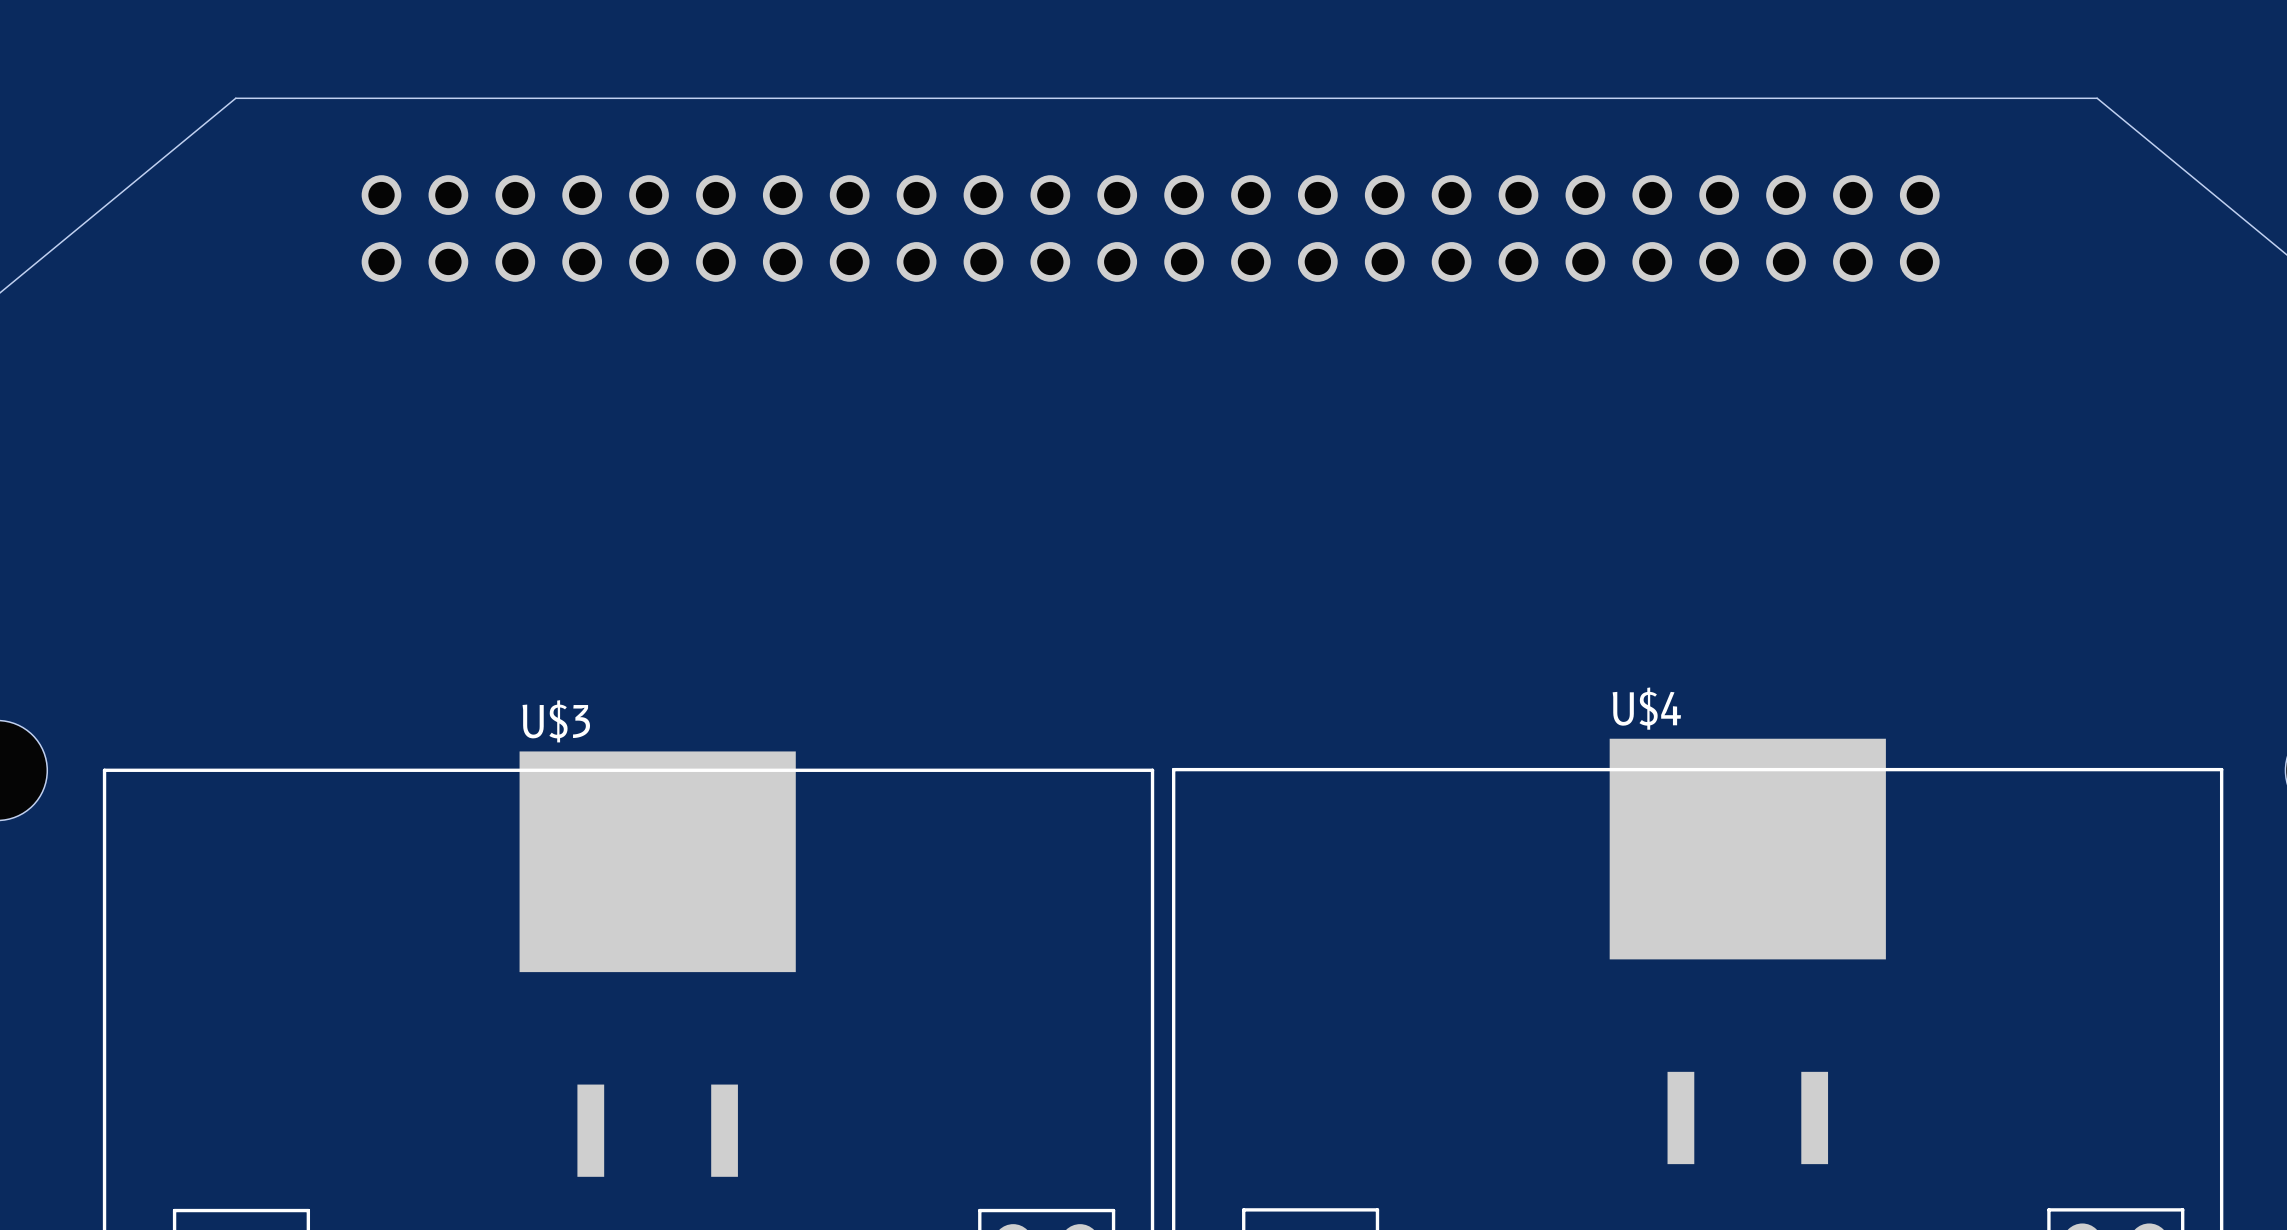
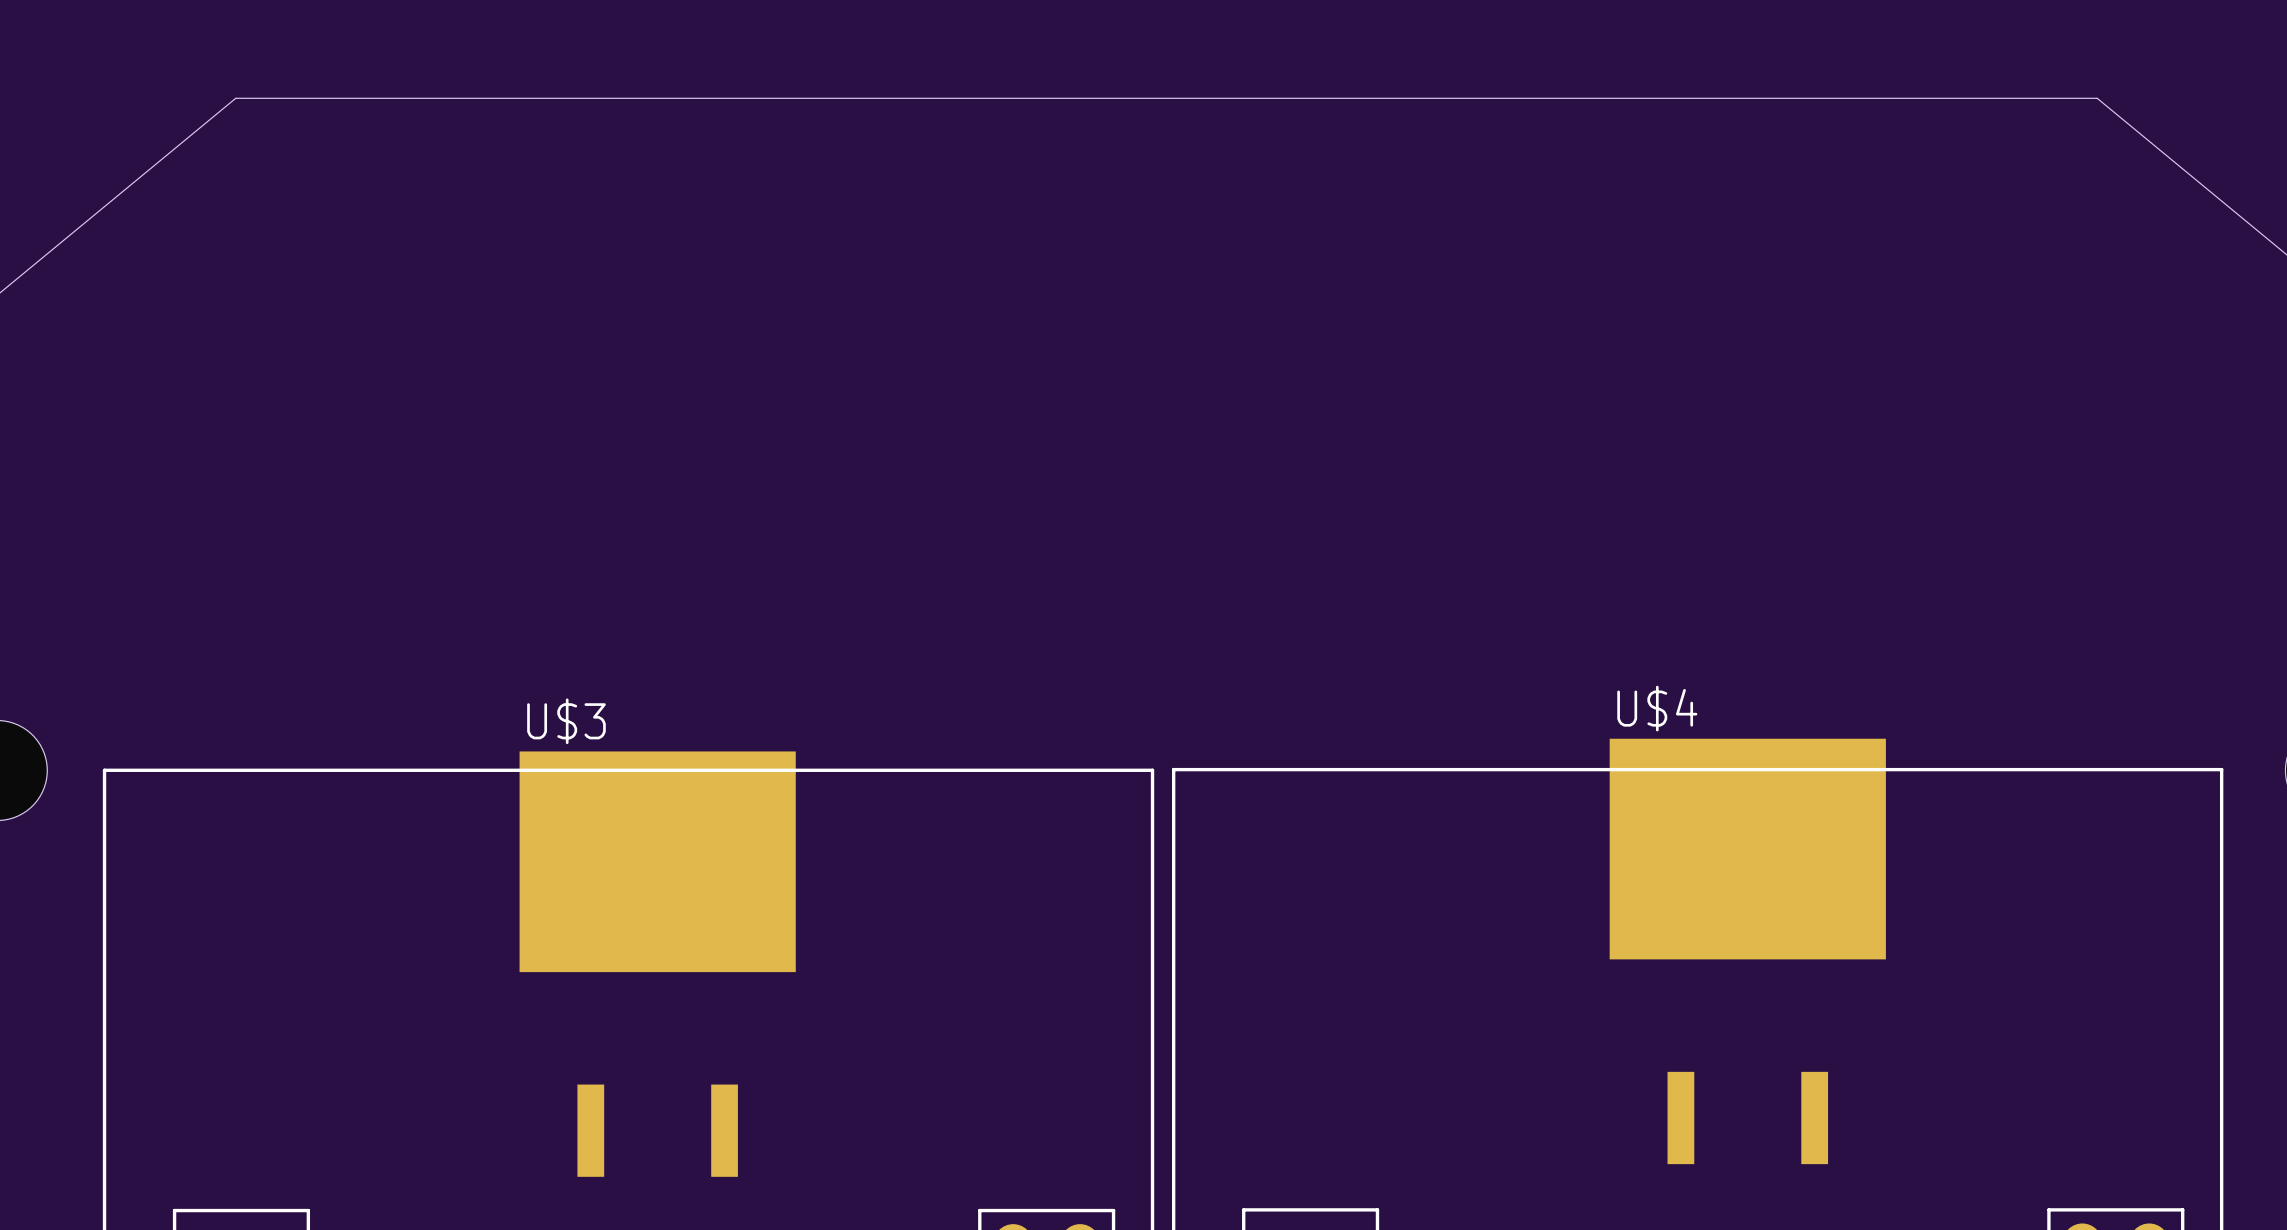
part: (1150, 228) -> none

